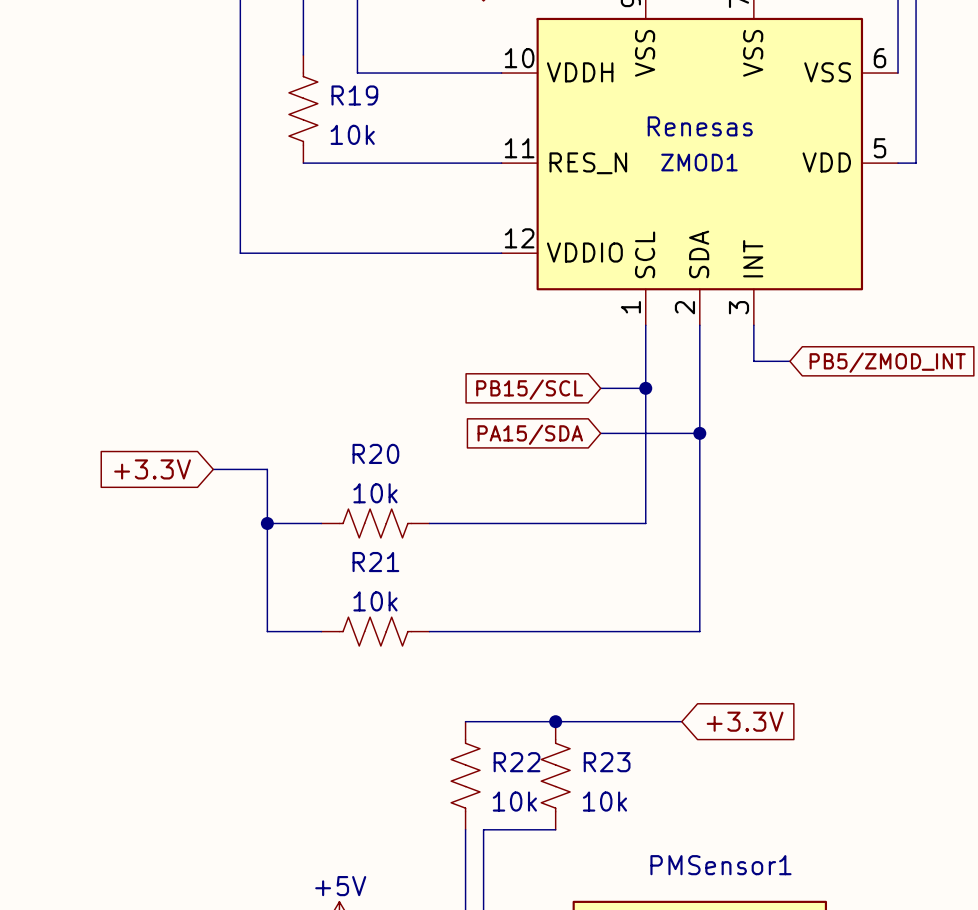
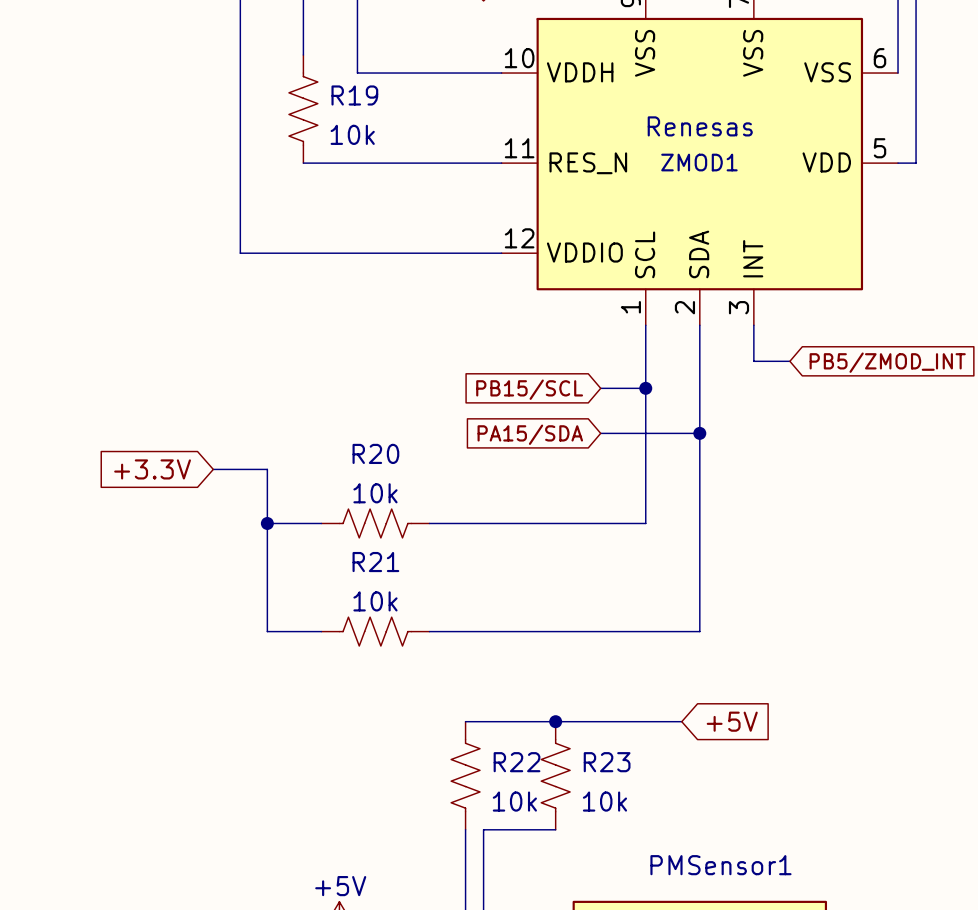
global label: +3.3V (745, 721) -> +5V (732, 721)

